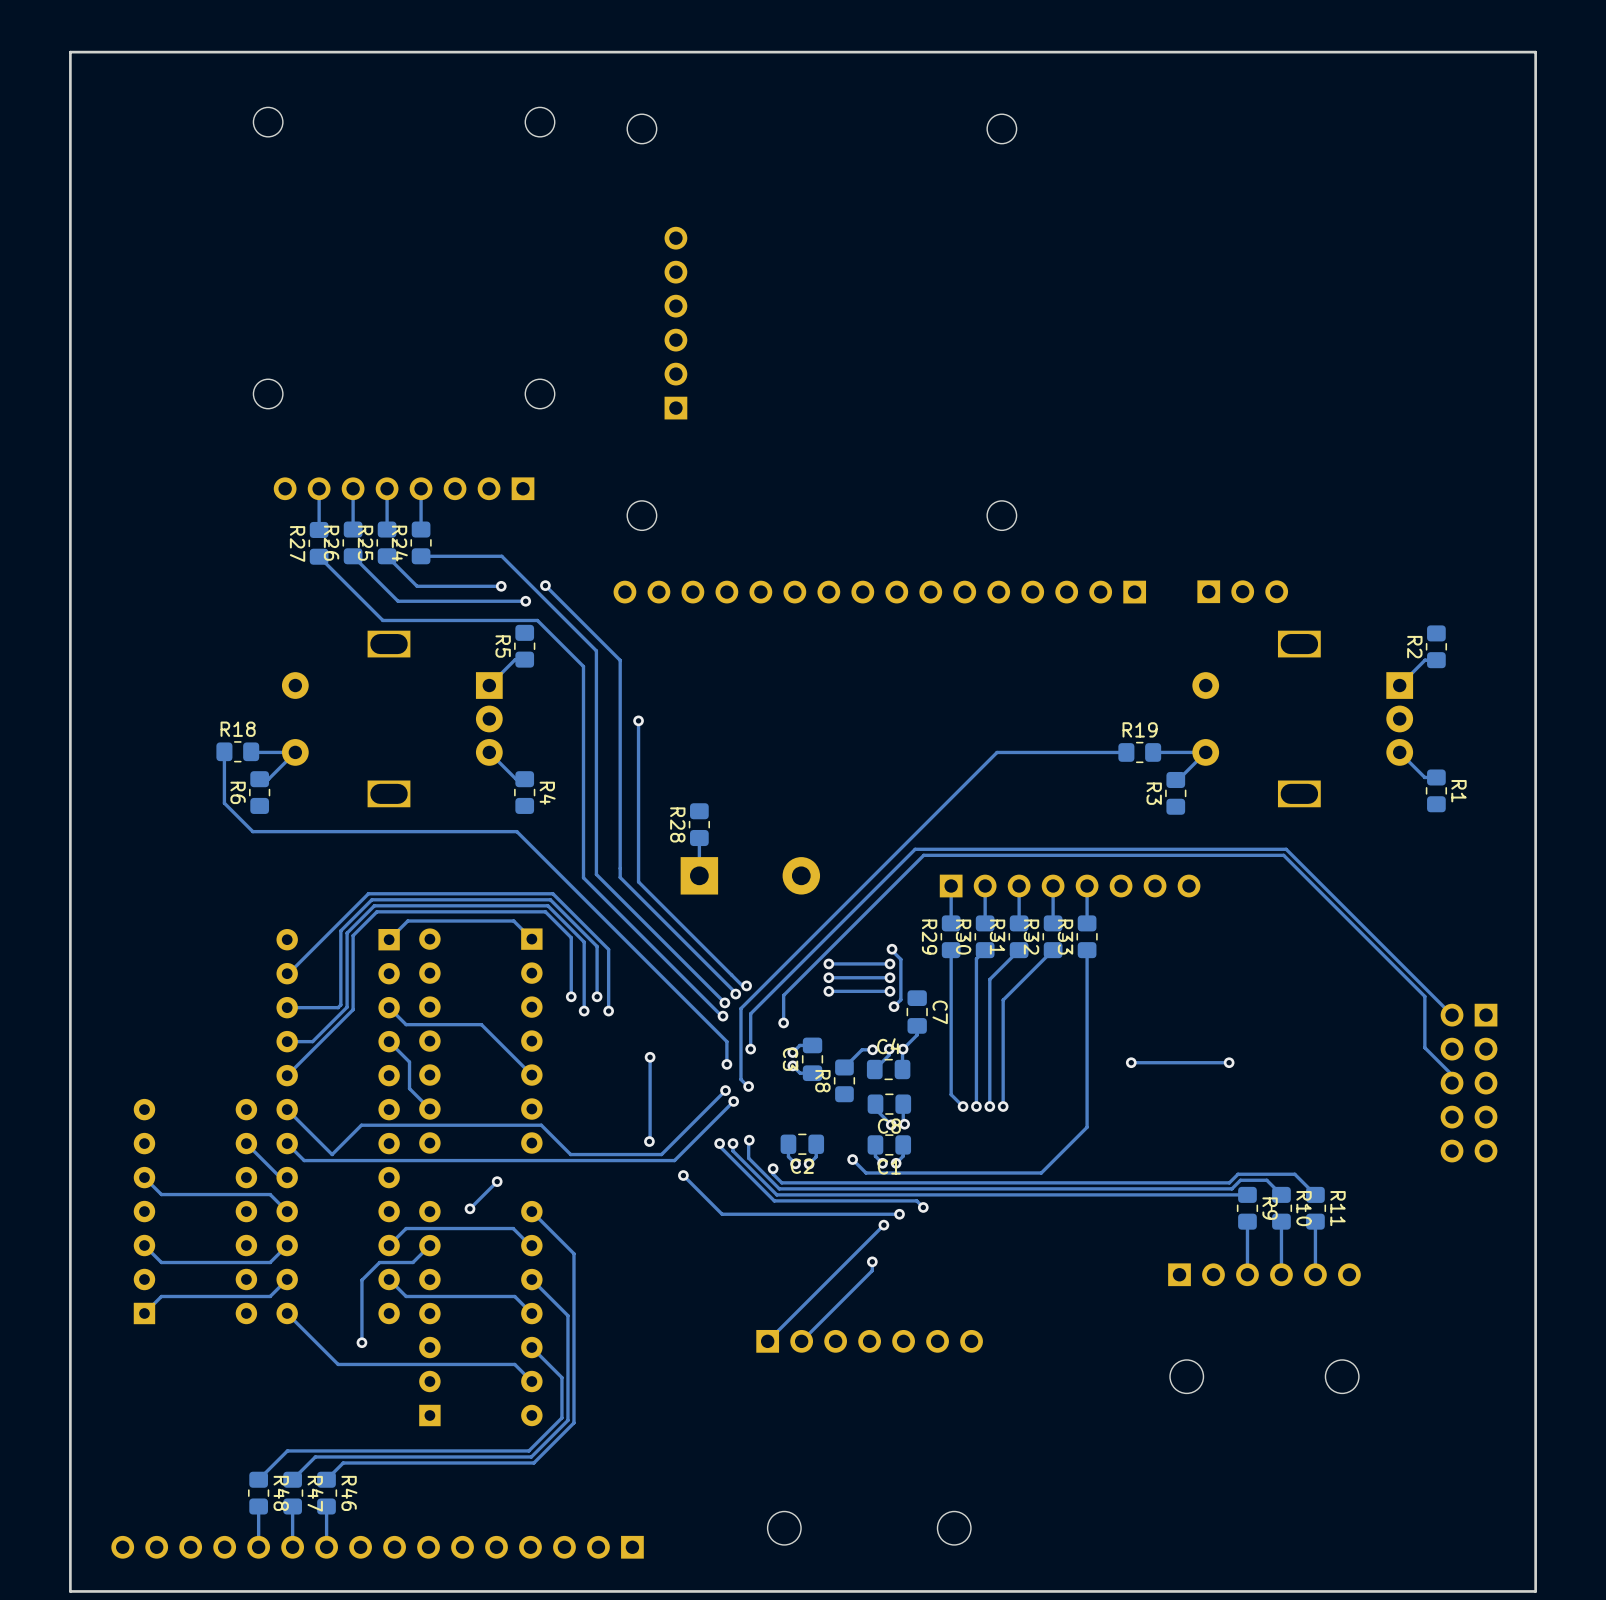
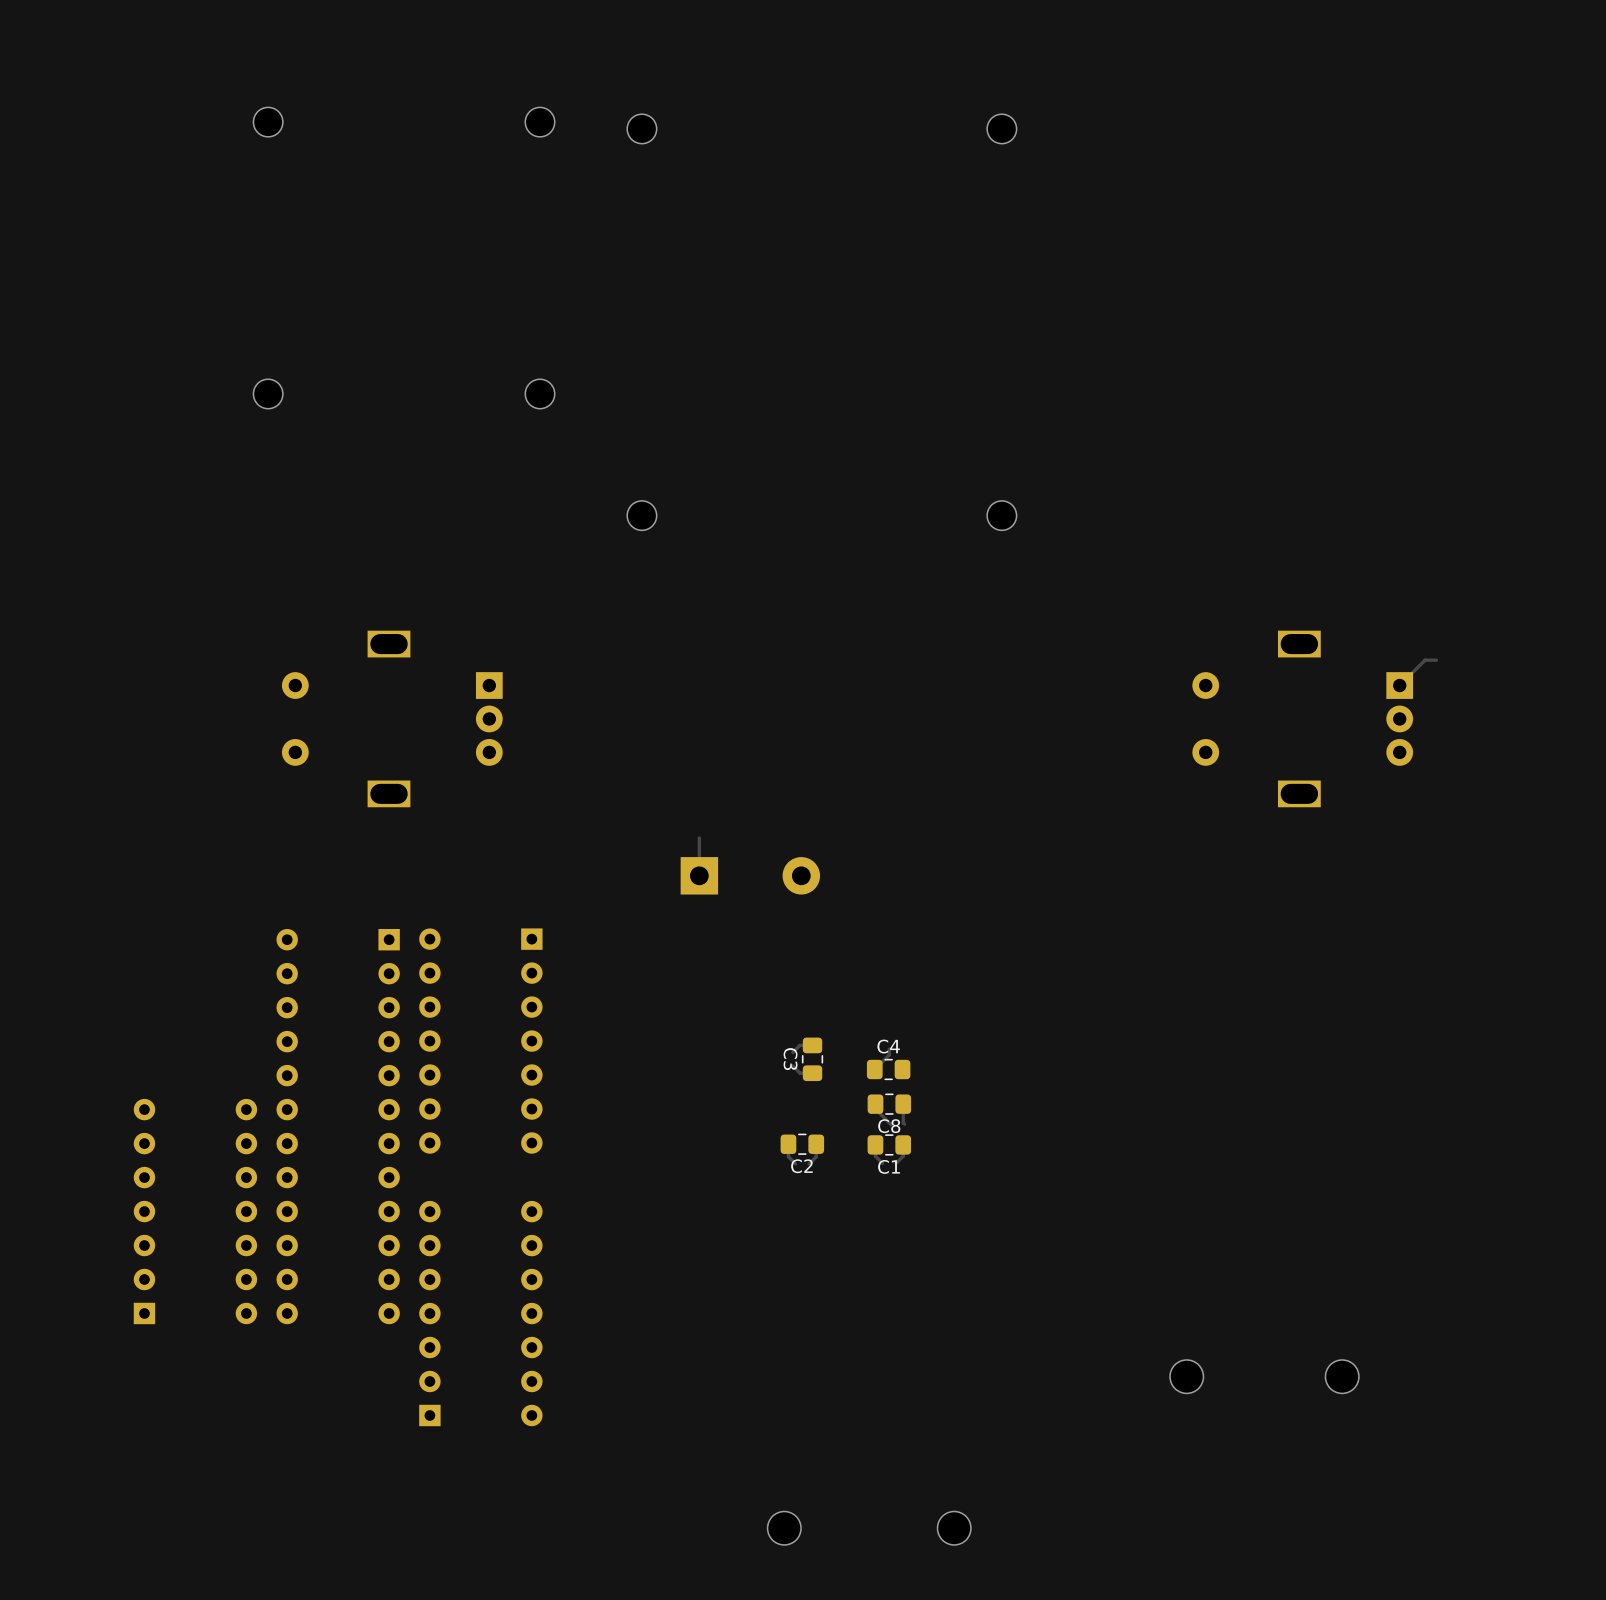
board edge: (1535, 52) (70, 52) (70, 1591) (1535, 1591) (1535, 52) -> none
part: (675, 323) -> none
track: (319, 488) (319, 529) -> none
track: (353, 488) (353, 529) -> none
track: (387, 488) (387, 529) -> none
part: (404, 488) -> none
track: (421, 488) (421, 529) -> none
R26: (353, 542) -> none
R25: (387, 542) -> none
R24: (421, 542) -> none
R27: (319, 543) -> none
track: (319, 556) (382, 620) (537, 620) (583, 666) (583, 877) (722, 1016) -> none
track: (353, 556) (398, 601) (525, 601) -> none
track: (387, 556) (417, 586) (502, 586) -> none
track: (421, 556) (501, 556) (596, 650) (596, 874) (724, 1002) -> none
track: (545, 585) (620, 660) (620, 877) (736, 994) -> none
via: (545, 585) -> none
via: (501, 586) -> none
part: (1242, 591) -> none
part: (879, 592) -> none
via: (525, 601) -> none
R5: (524, 646) -> none
R2: (1436, 646) -> none
track: (524, 659) (515, 659) (489, 685) -> none
track: (638, 720) (638, 881) (742, 985) (746, 985) -> none
via: (638, 720) -> none
track: (224, 751) (224, 803) (252, 831) (516, 831) (726, 1041) (726, 1064) (728, 1066) -> none
R18: (237, 751) -> none
track: (251, 751) (295, 752) (268, 779) (259, 779) -> none
track: (489, 752) (516, 779) (524, 779) -> none
track: (1126, 752) (997, 752) (740, 1008) (740, 1079) (747, 1086) -> none
R19: (1139, 752) -> none
track: (1153, 752) (1205, 752) (1178, 779) (1175, 779) -> none
track: (1399, 752) (1424, 777) (1436, 777) -> none
R1: (1436, 790) -> none
R6: (259, 792) -> none
R4: (524, 792) -> none
R3: (1175, 793) -> none
R28: (699, 824) -> none
track: (951, 886) (951, 923) -> none
track: (985, 886) (985, 923) -> none
track: (1019, 886) (1019, 923) -> none
track: (1053, 886) (1053, 923) -> none
part: (1070, 886) -> none
track: (1087, 886) (1087, 923) -> none
R29: (951, 936) -> none
R30: (985, 936) -> none
R31: (1019, 936) -> none
R32: (1053, 936) -> none
R33: (1087, 936) -> none
track: (531, 939) (513, 921) (407, 921) (389, 939) -> none
via: (892, 949) -> none
track: (891, 950) (900, 959) (900, 999) (894, 1006) -> none
track: (951, 950) (951, 1094) (963, 1106) -> none
track: (985, 950) (976, 958) (976, 1106) -> none
track: (1019, 950) (989, 979) (989, 1106) -> none
track: (1053, 950) (1003, 1000) (1003, 1106) -> none
track: (1087, 950) (1087, 1127) (1041, 1172) (866, 1172) (852, 1159) -> none
via: (828, 963) -> none
track: (890, 963) (828, 963) -> none
via: (890, 963) -> none
track: (287, 973) (368, 893) (552, 893) (608, 949) (608, 1011) -> none
via: (828, 977) -> none
track: (890, 977) (828, 977) -> none
via: (890, 977) -> none
via: (746, 985) -> none
via: (828, 991) -> none
track: (890, 991) (828, 991) -> none
via: (890, 991) -> none
via: (735, 994) -> none
track: (571, 996) (571, 937) (545, 911) (376, 911) (353, 935) (353, 1009) (287, 1075) -> none
via: (571, 996) -> none
track: (597, 996) (597, 946) (550, 899) (371, 899) (340, 930) (340, 1004) (338, 1007) (287, 1007) -> none
via: (597, 996) -> none
via: (724, 1002) -> none
via: (894, 1006) -> none
track: (389, 1007) (406, 1024) (481, 1024) (531, 1075) -> none
track: (584, 1011) (584, 942) (547, 905) (374, 905) (347, 933) (347, 1007) (312, 1041) (287, 1041) -> none
via: (584, 1011) -> none
via: (608, 1011) -> none
C7: (917, 1012) -> none
track: (1452, 1015) (1286, 849) (915, 849) (750, 1013) (750, 1049) -> none
via: (722, 1016) -> none
track: (783, 1022) (783, 995) (923, 855) (1283, 855) (1424, 996) (1424, 1047) (1452, 1074) (1452, 1083) -> none
via: (783, 1022) -> none
track: (917, 1025) (917, 1035) (902, 1049) (902, 1069) -> none
track: (389, 1041) (409, 1062) (409, 1088) (429, 1109) -> none
via: (750, 1049) -> none
track: (872, 1049) (862, 1049) (844, 1067) -> none
via: (872, 1049) -> none
via: (889, 1049) -> none
via: (903, 1049) -> none
via: (792, 1052) -> none
track: (650, 1057) (650, 1140) (649, 1141) (649, 1140) (650, 1140) -> none
via: (650, 1057) -> none
via: (1131, 1062) -> none
track: (1229, 1062) (1131, 1062) -> none
via: (1229, 1062) -> none
via: (726, 1064) -> none
via: (792, 1065) -> none
R8: (844, 1080) -> none
part: (1469, 1083) -> none
via: (748, 1086) -> none
track: (725, 1090) (661, 1154) (570, 1154) (541, 1125) (361, 1125) (332, 1154) (287, 1109) -> none
via: (725, 1090) -> none
track: (733, 1101) (674, 1160) (304, 1160) (287, 1143) -> none
via: (733, 1101) -> none
via: (963, 1106) -> none
via: (976, 1106) -> none
via: (989, 1106) -> none
via: (1003, 1106) -> none
via: (891, 1124) -> none
via: (904, 1124) -> none
track: (748, 1140) (748, 1158) (779, 1188) (1231, 1188) (1240, 1180) (1266, 1180) (1281, 1194) -> none
via: (749, 1140) -> none
via: (649, 1141) -> none
track: (733, 1142) (733, 1151) (776, 1194) (1247, 1194) -> none
track: (246, 1143) (280, 1177) (287, 1177) -> none
track: (719, 1143) (719, 1146) (774, 1200) (916, 1200) (923, 1207) -> none
via: (719, 1143) -> none
via: (733, 1143) -> none
via: (852, 1159) -> none
via: (795, 1163) -> none
via: (809, 1163) -> none
via: (882, 1163) -> none
via: (896, 1163) -> none
track: (773, 1168) (773, 1174) (781, 1182) (1229, 1182) (1238, 1174) (1294, 1174) (1315, 1194) -> none
via: (773, 1168) -> none
track: (683, 1175) (722, 1214) (899, 1214) -> none
via: (683, 1175) -> none
track: (144, 1177) (161, 1194) (270, 1194) (287, 1211) -> none
track: (497, 1181) (470, 1208) -> none
via: (497, 1181) -> none
via: (923, 1207) -> none
via: (470, 1208) -> none
R9: (1247, 1208) -> none
R10: (1281, 1208) -> none
R11: (1315, 1208) -> none
track: (531, 1211) (573, 1253) (573, 1422) (533, 1463) (343, 1463) (326, 1479) -> none
via: (899, 1214) -> none
track: (1247, 1221) (1247, 1274) -> none
track: (1281, 1221) (1281, 1274) -> none
track: (1315, 1221) (1315, 1274) -> none
track: (885, 1223) (767, 1341) -> none
via: (883, 1225) -> none
track: (287, 1245) (270, 1262) (161, 1262) (144, 1245) -> none
track: (389, 1245) (406, 1228) (513, 1228) (530, 1245) -> none
track: (429, 1245) (412, 1262) (379, 1262) (361, 1280) (361, 1344) -> none
track: (872, 1261) (872, 1270) (801, 1341) -> none
via: (872, 1261) -> none
part: (1264, 1274) -> none
track: (287, 1279) (270, 1296) (161, 1296) (144, 1313) -> none
track: (389, 1279) (406, 1296) (514, 1296) (531, 1313) -> none
track: (531, 1279) (567, 1315) (567, 1420) (531, 1456) (315, 1456) (292, 1479) -> none
track: (287, 1313) (338, 1364) (514, 1364) (531, 1381) -> none
part: (869, 1341) -> none
via: (361, 1342) -> none
track: (531, 1347) (561, 1377) (561, 1417) (528, 1450) (287, 1450) (258, 1479) -> none
R48: (258, 1493) -> none
R47: (292, 1493) -> none
R46: (326, 1493) -> none
track: (258, 1506) (258, 1547) -> none
track: (292, 1506) (292, 1547) -> none
track: (326, 1506) (326, 1547) -> none
part: (377, 1547) -> none

